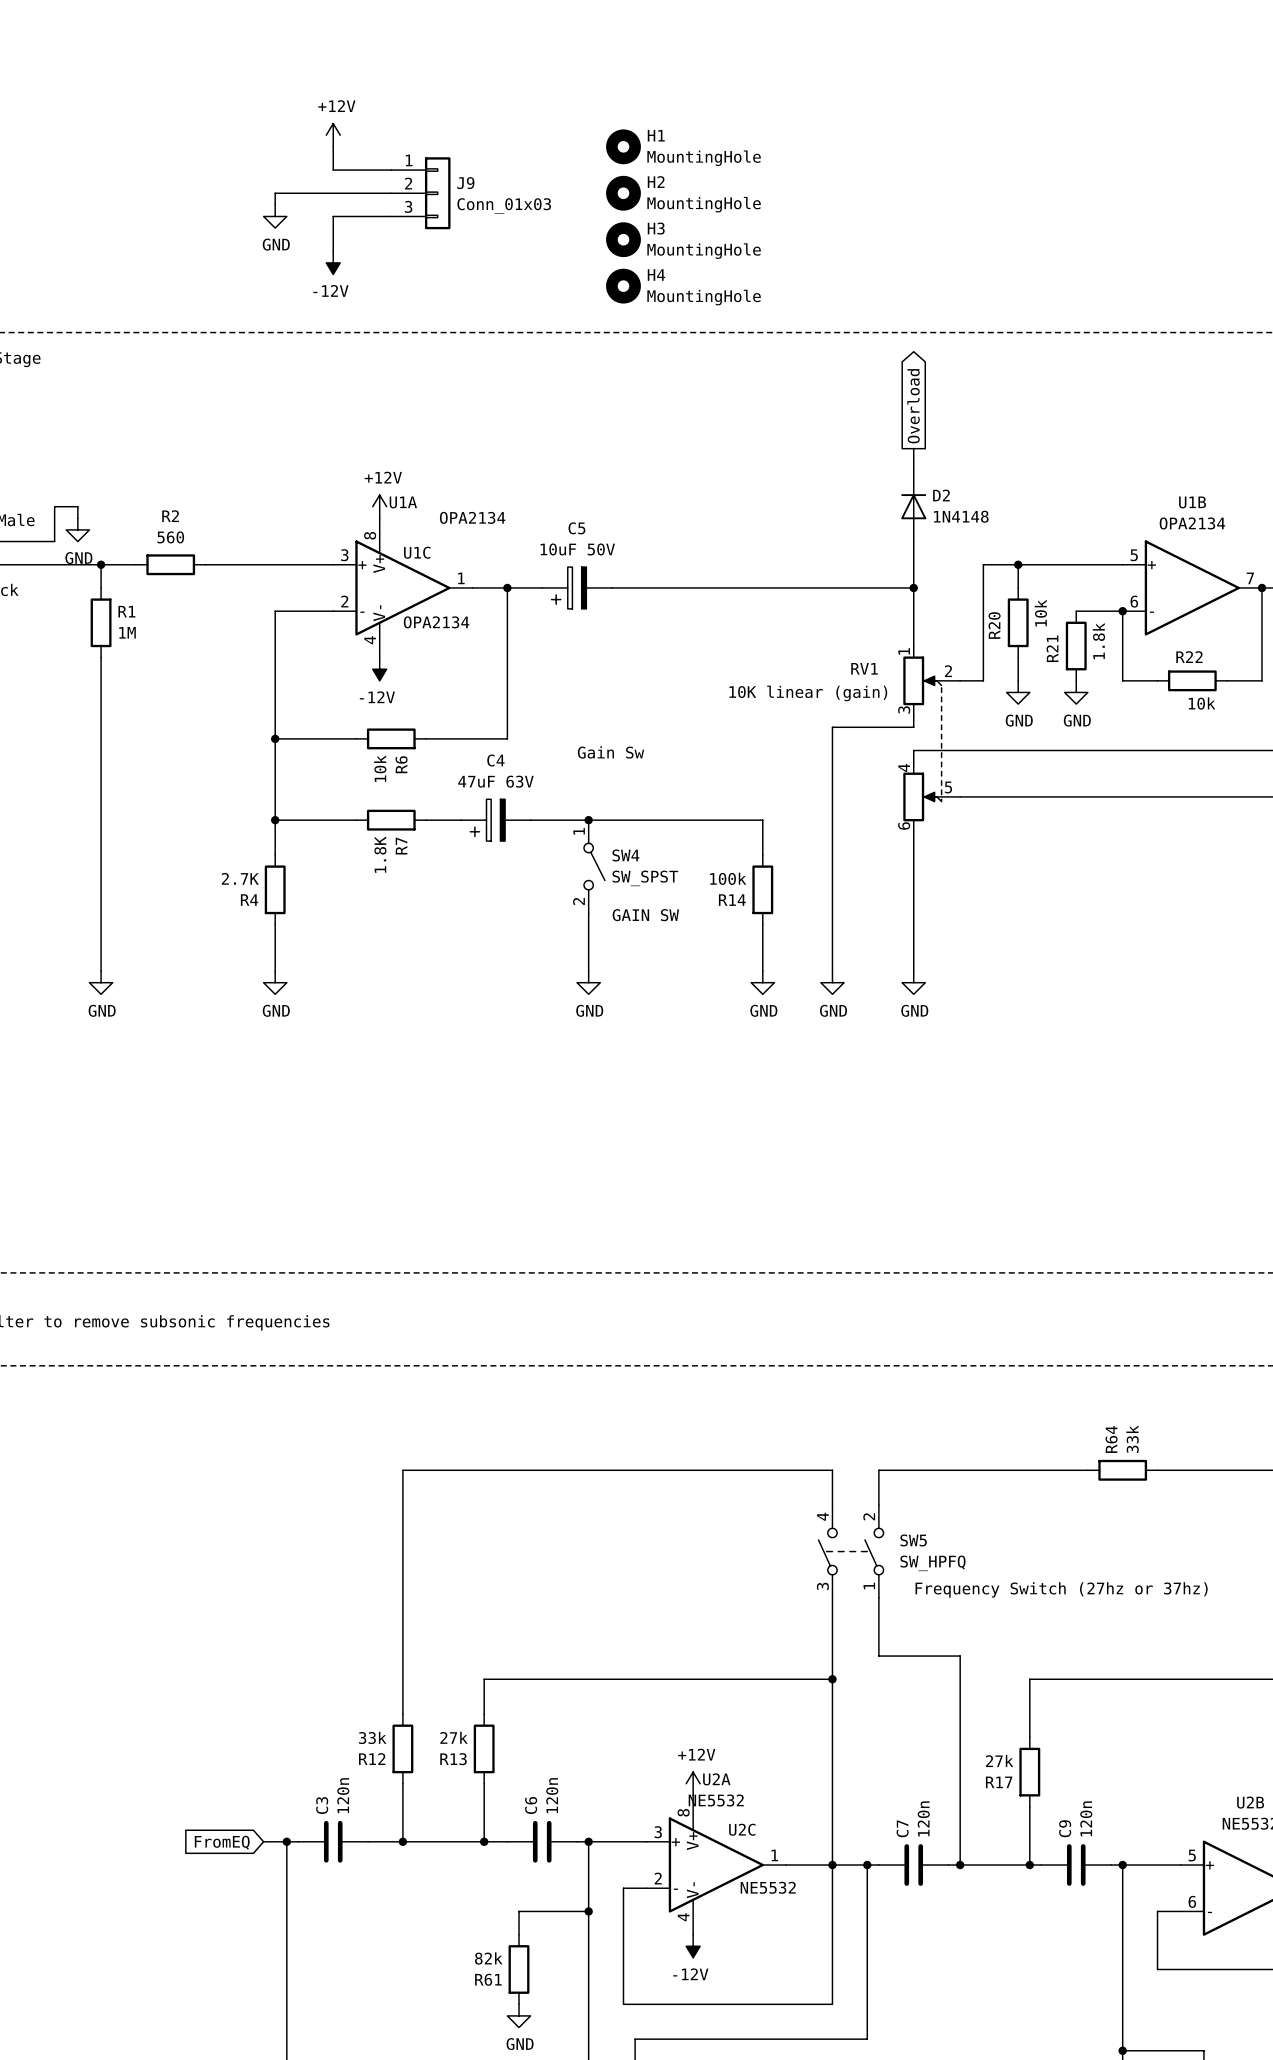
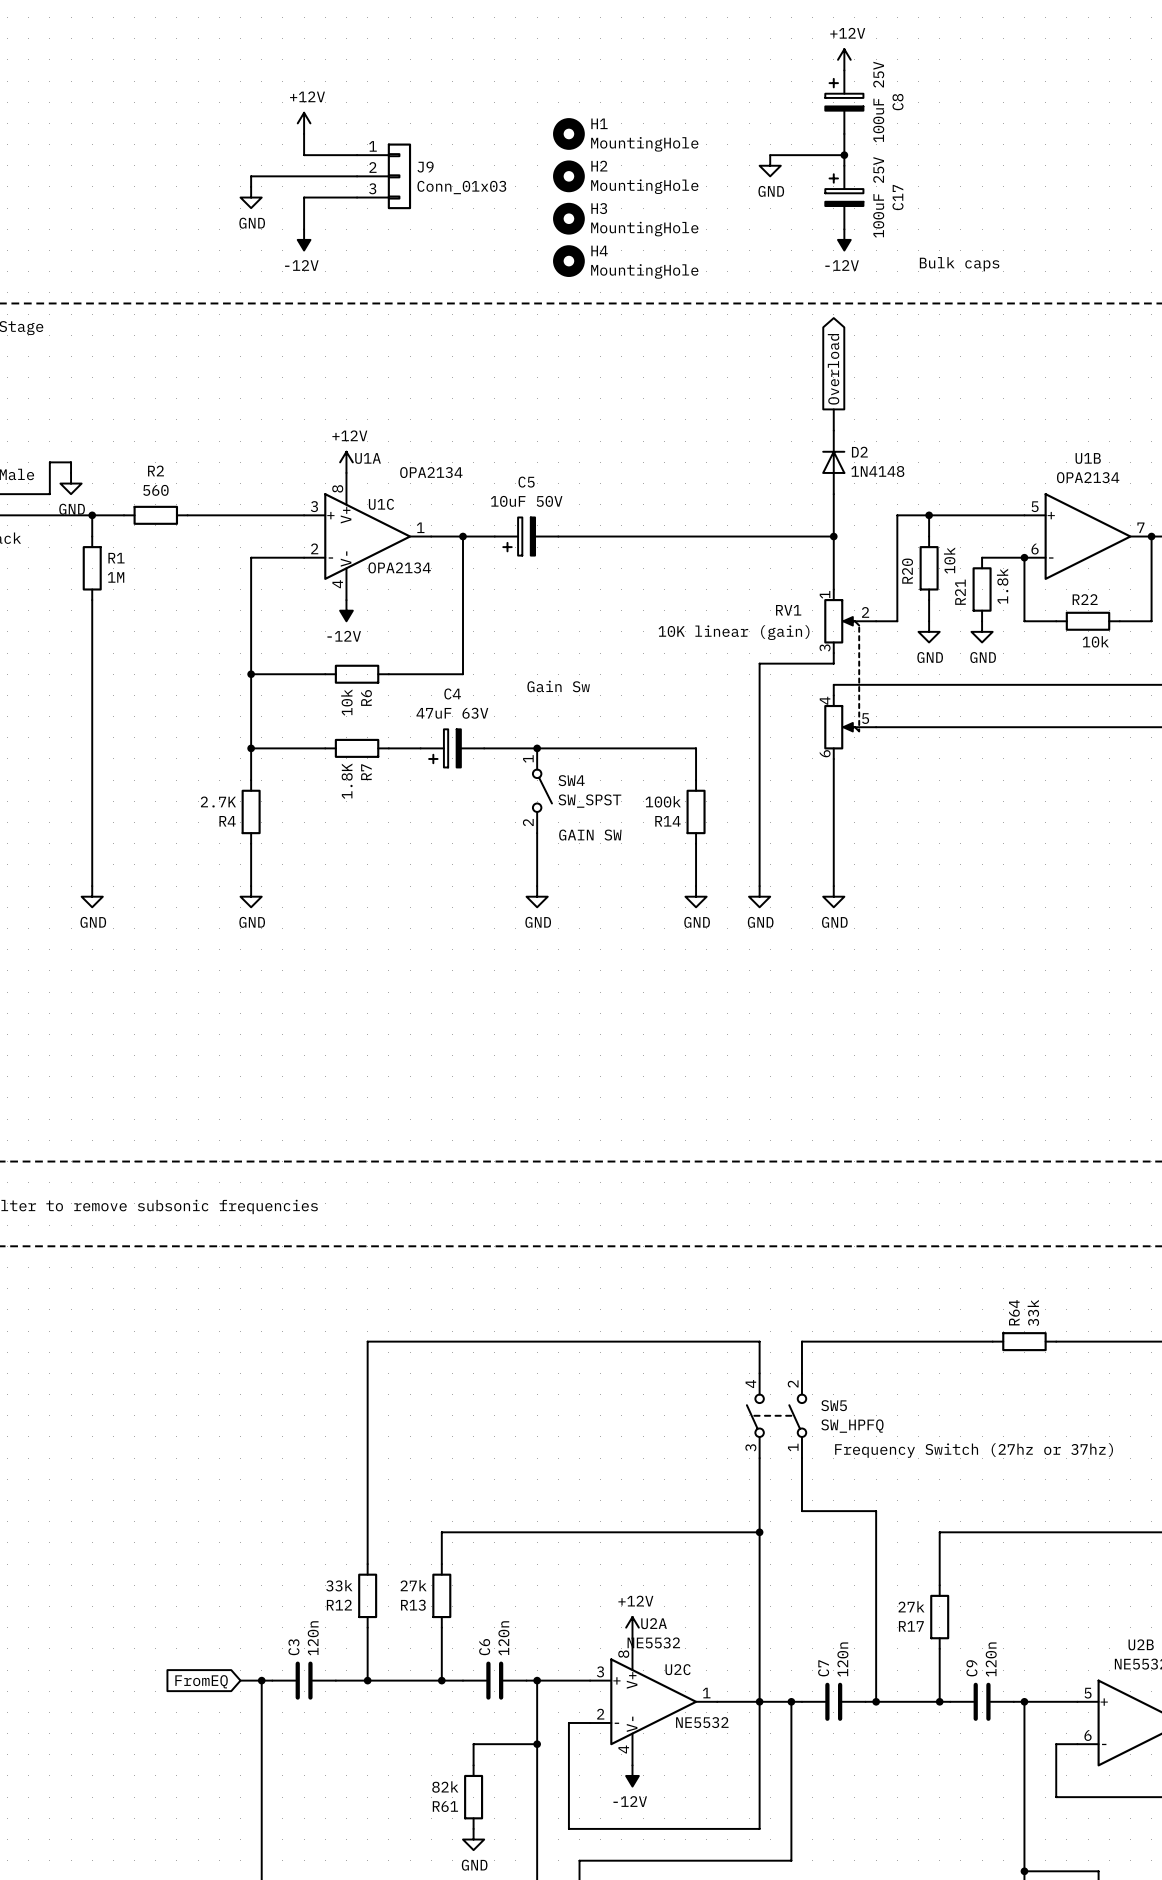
power symbol: none -> +12V (844, 59)
C8: none -> 100uF 25V (844, 102)
wire: none -> (844, 133) (844, 165)
wire: none -> (770, 155) (844, 155)
junction: none -> (844, 155)
power symbol: none -> GND (770, 165)
C17: none -> 100uF 25V (844, 197)
power symbol: none -> -12V (844, 239)
text: none -> Bulk caps (959, 264)

